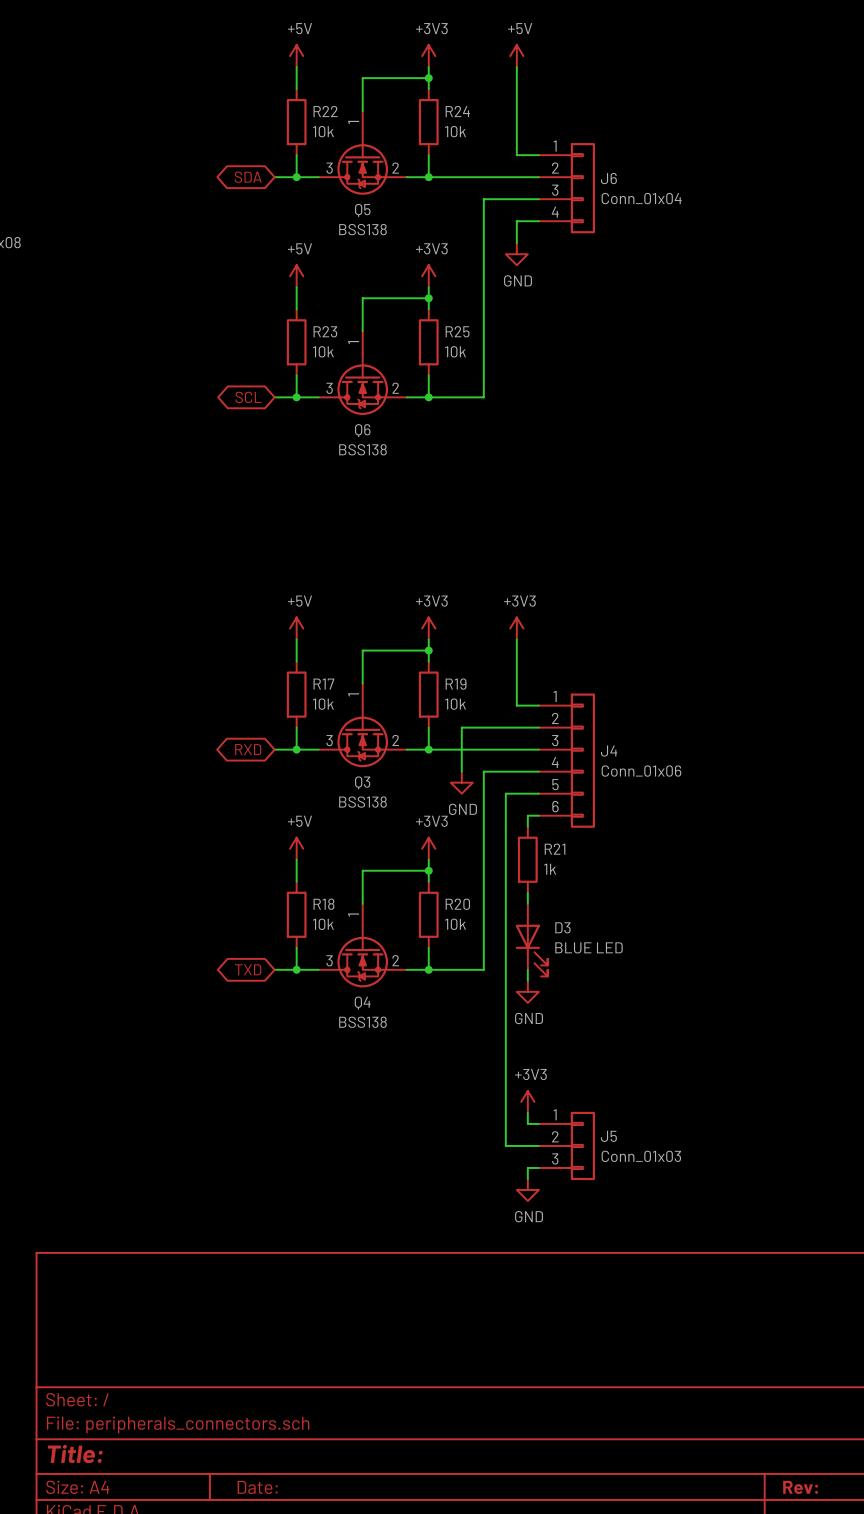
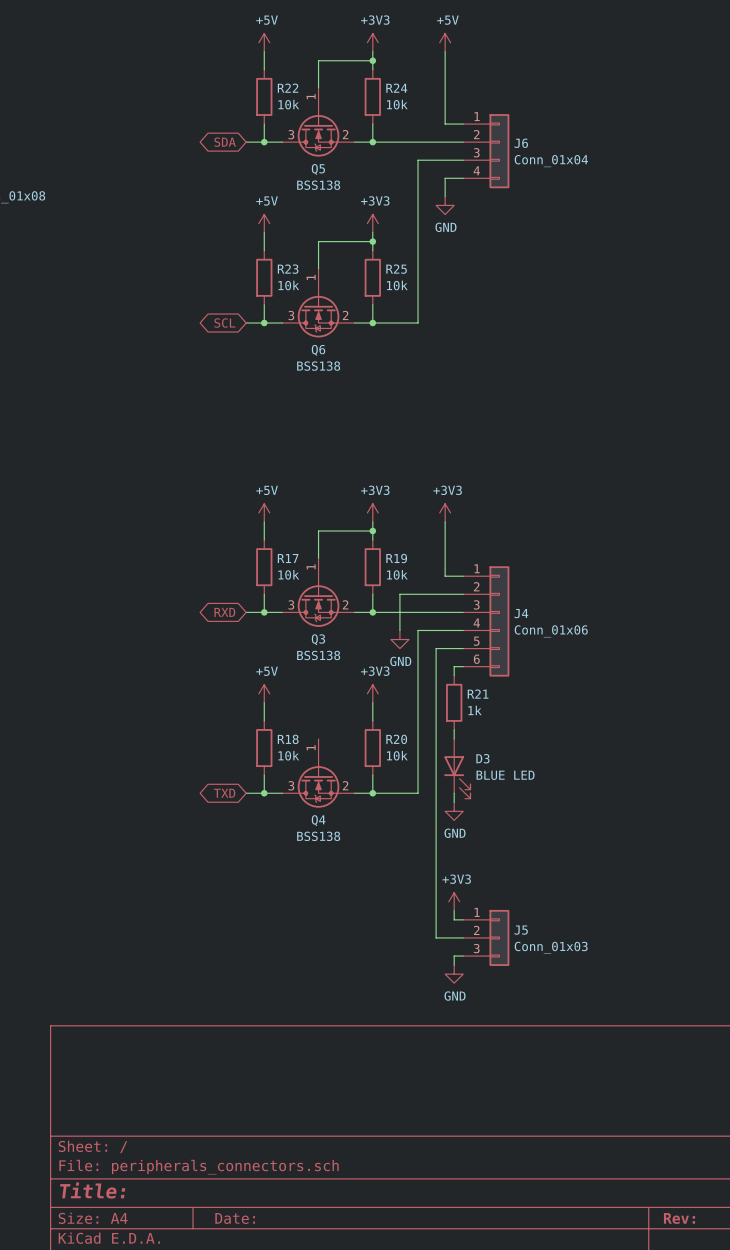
wire: (428, 870) (362, 870) (362, 903) -> none
junction: (428, 870) -> none

